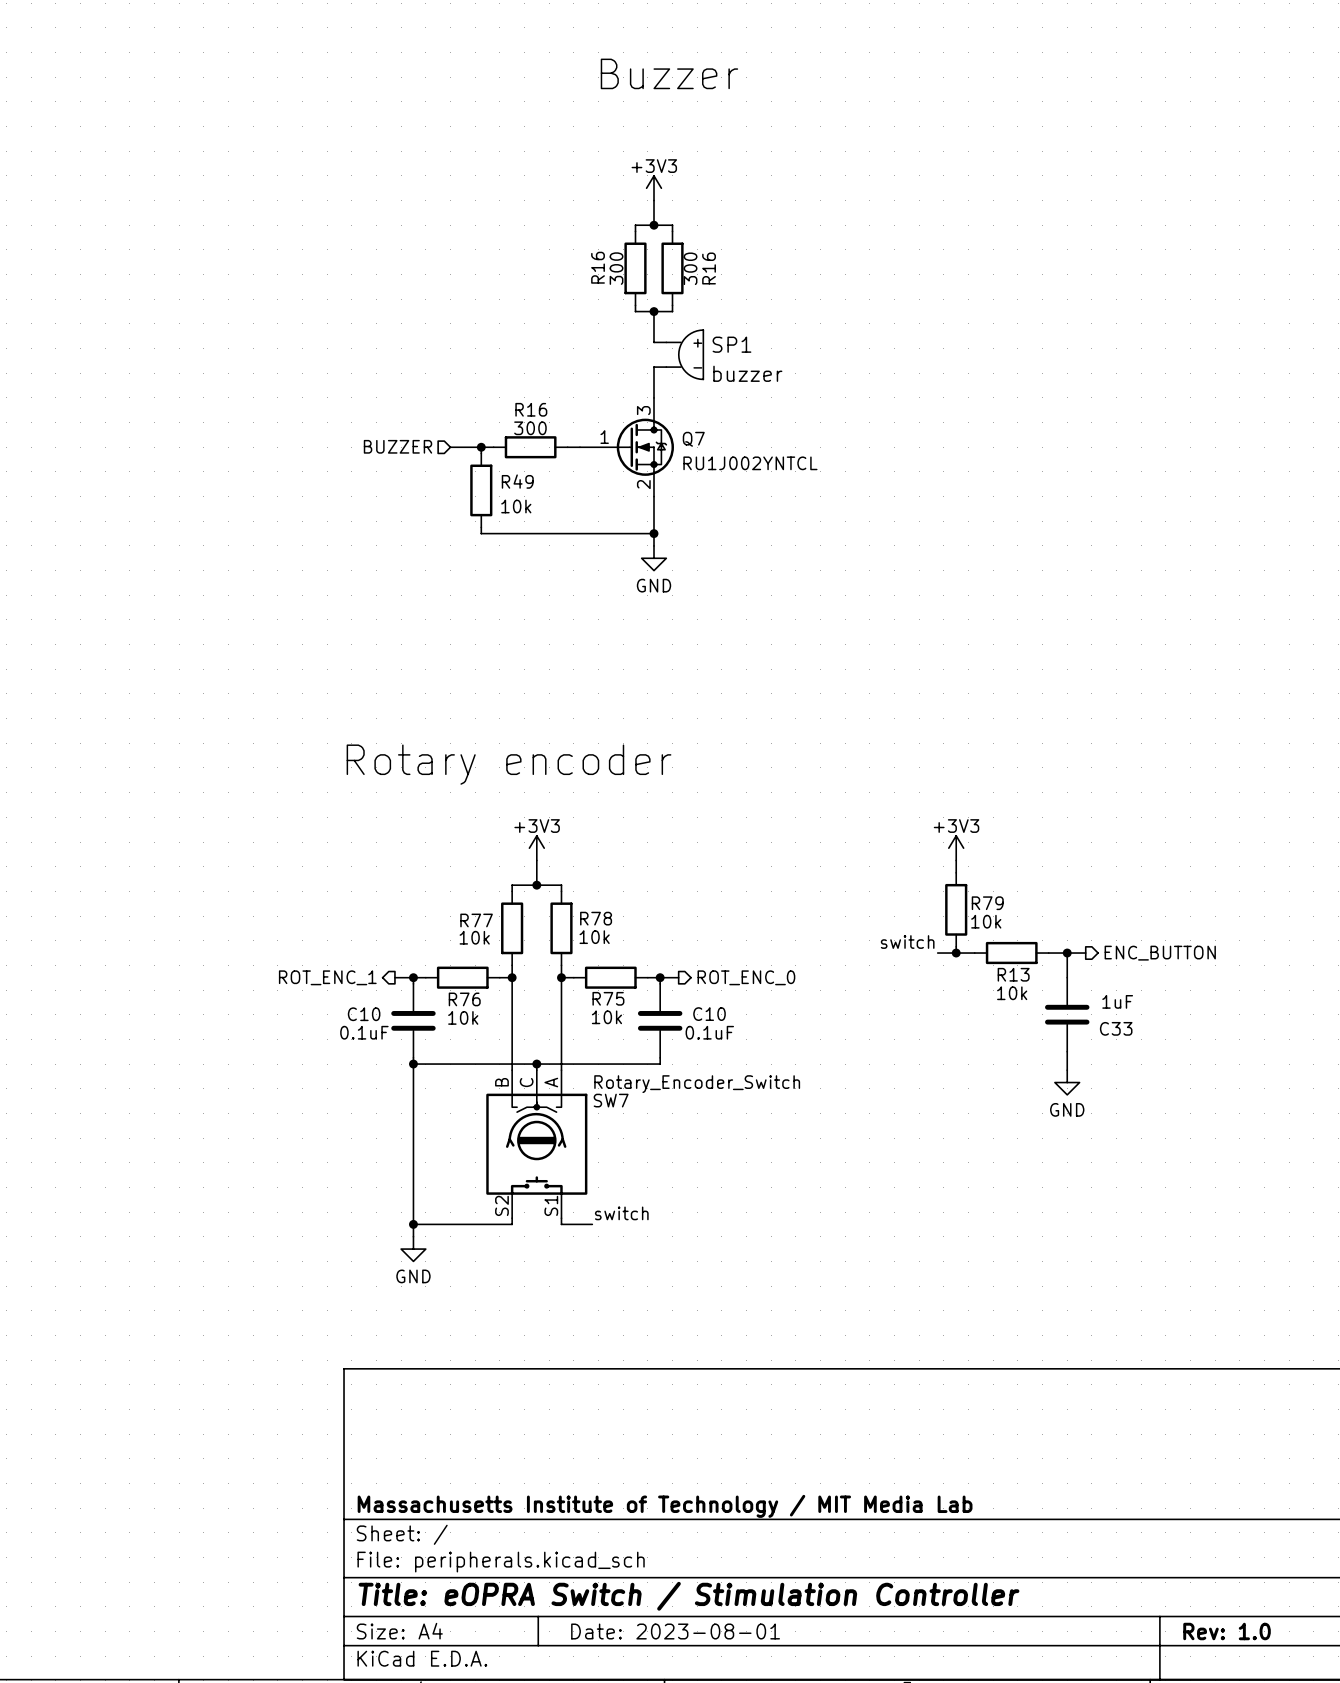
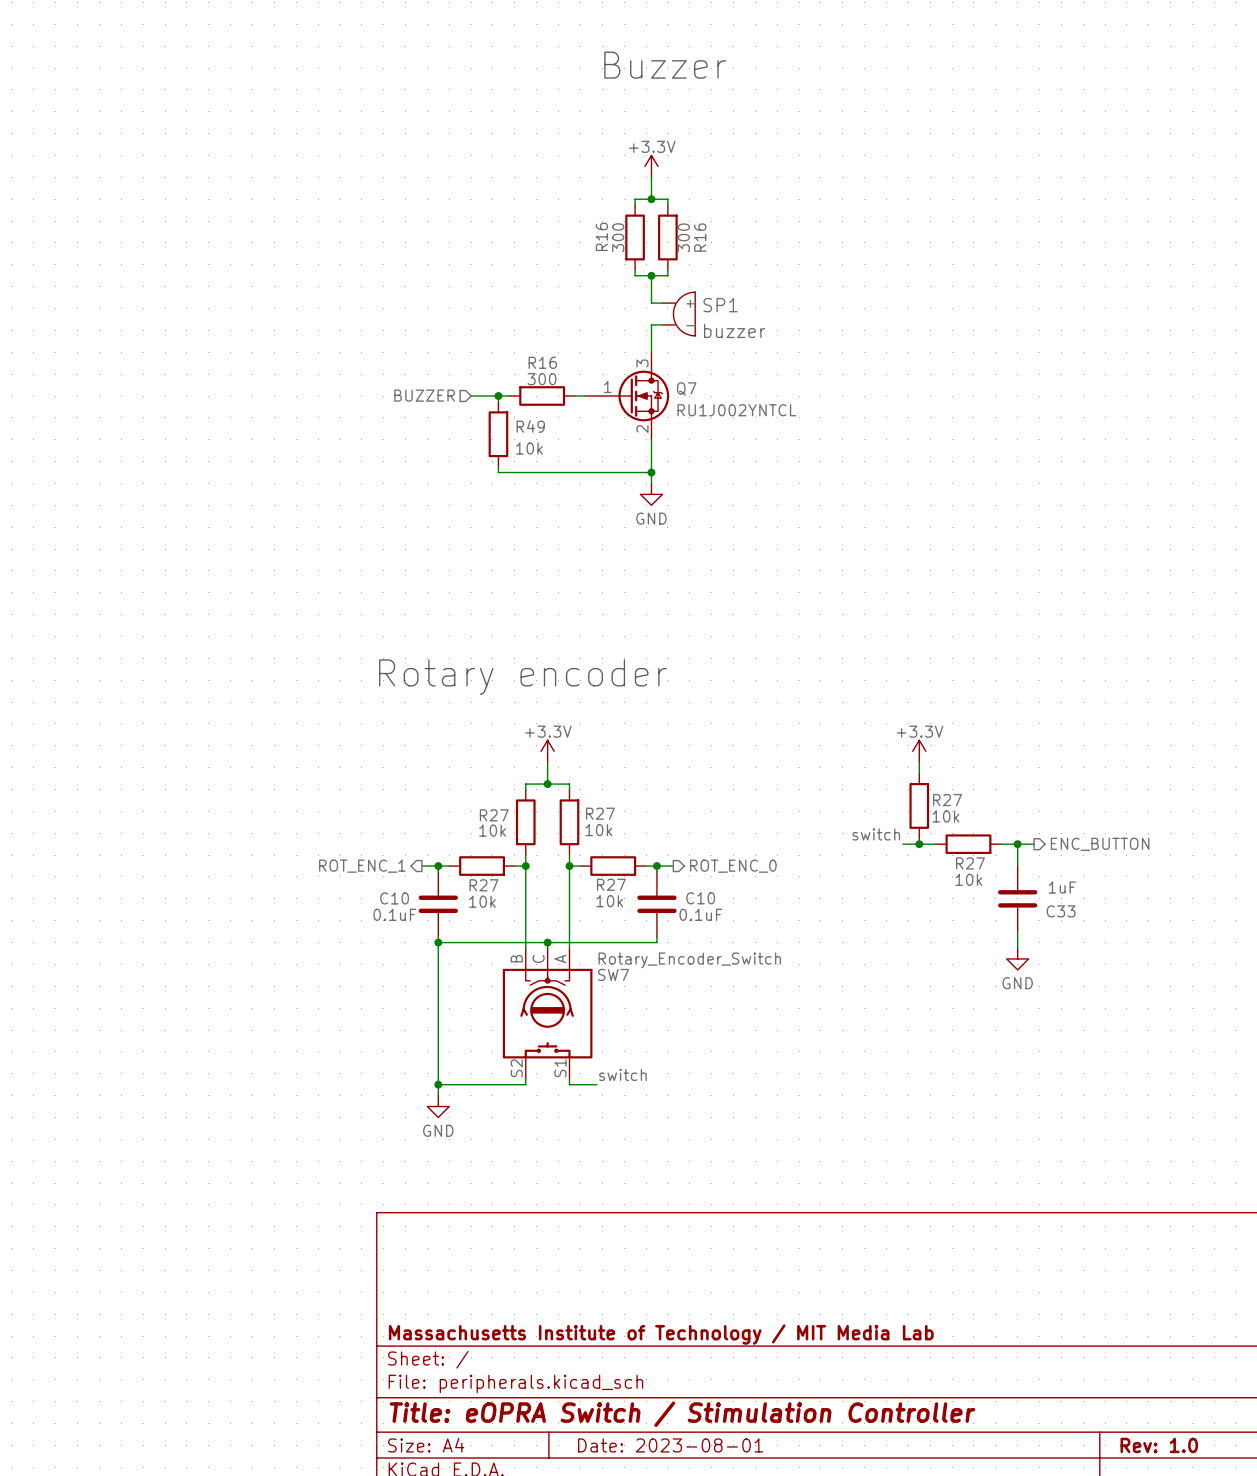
power symbol: +3V3 (654, 188) -> +3.3V (651, 166)
power symbol: +3V3 (536, 848) -> +3.3V (547, 751)
power symbol: +3V3 (956, 848) -> +3.3V (919, 751)
R79 name: R79 (987, 903) -> R27 (947, 800)
R78 name: R78 (596, 918) -> R27 (600, 813)
R77 name: R77 (476, 920) -> R27 (494, 815)
R13 name: R13 (1013, 974) -> R27 (970, 863)
R75 name: R75 (608, 998) -> R27 (611, 884)
R76 name: R76 (464, 999) -> R27 (483, 885)

